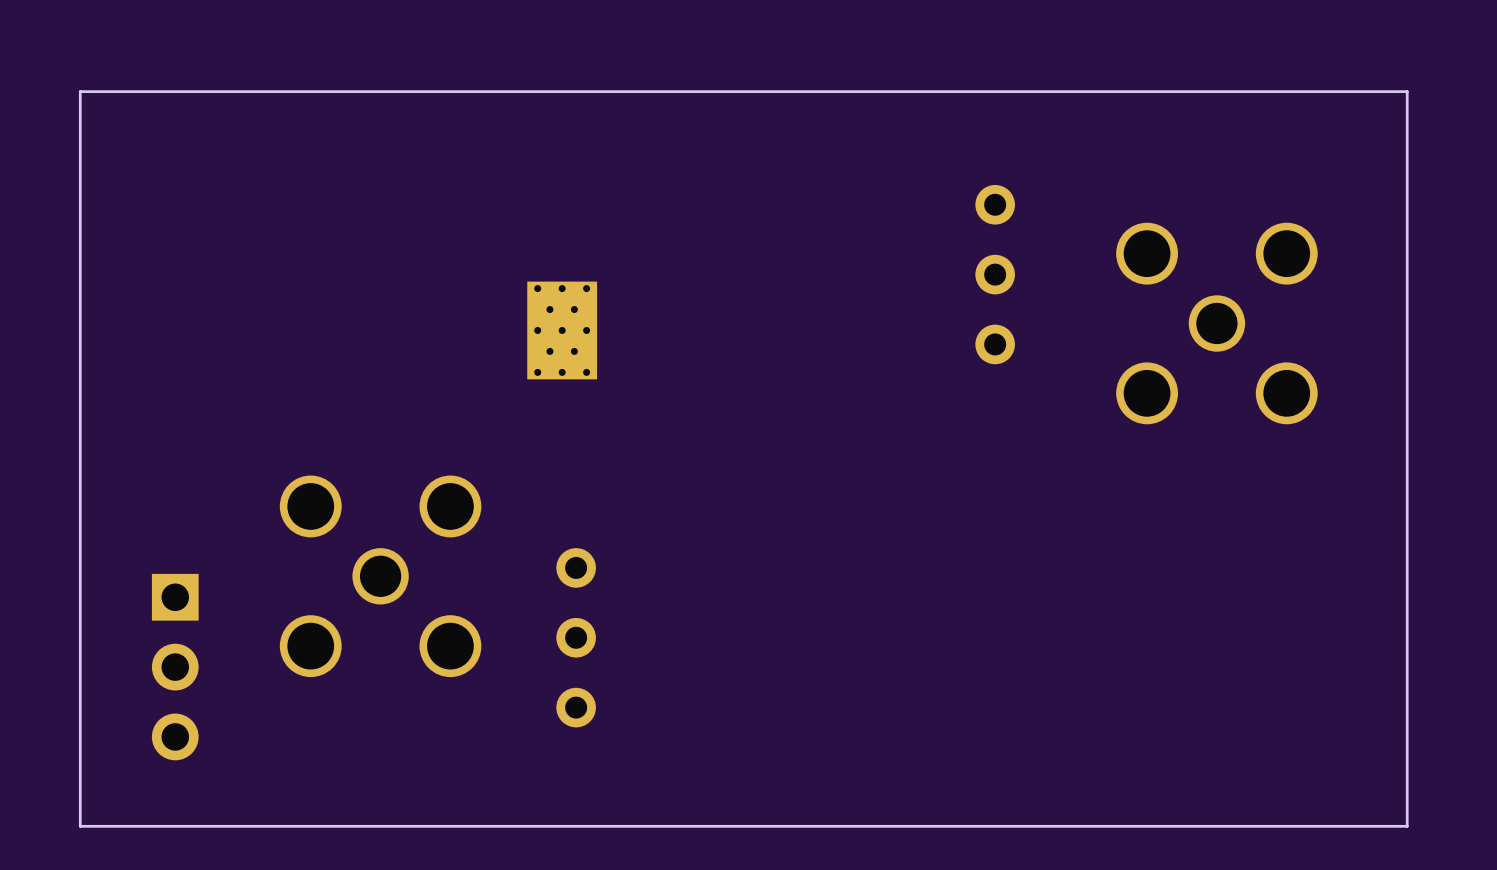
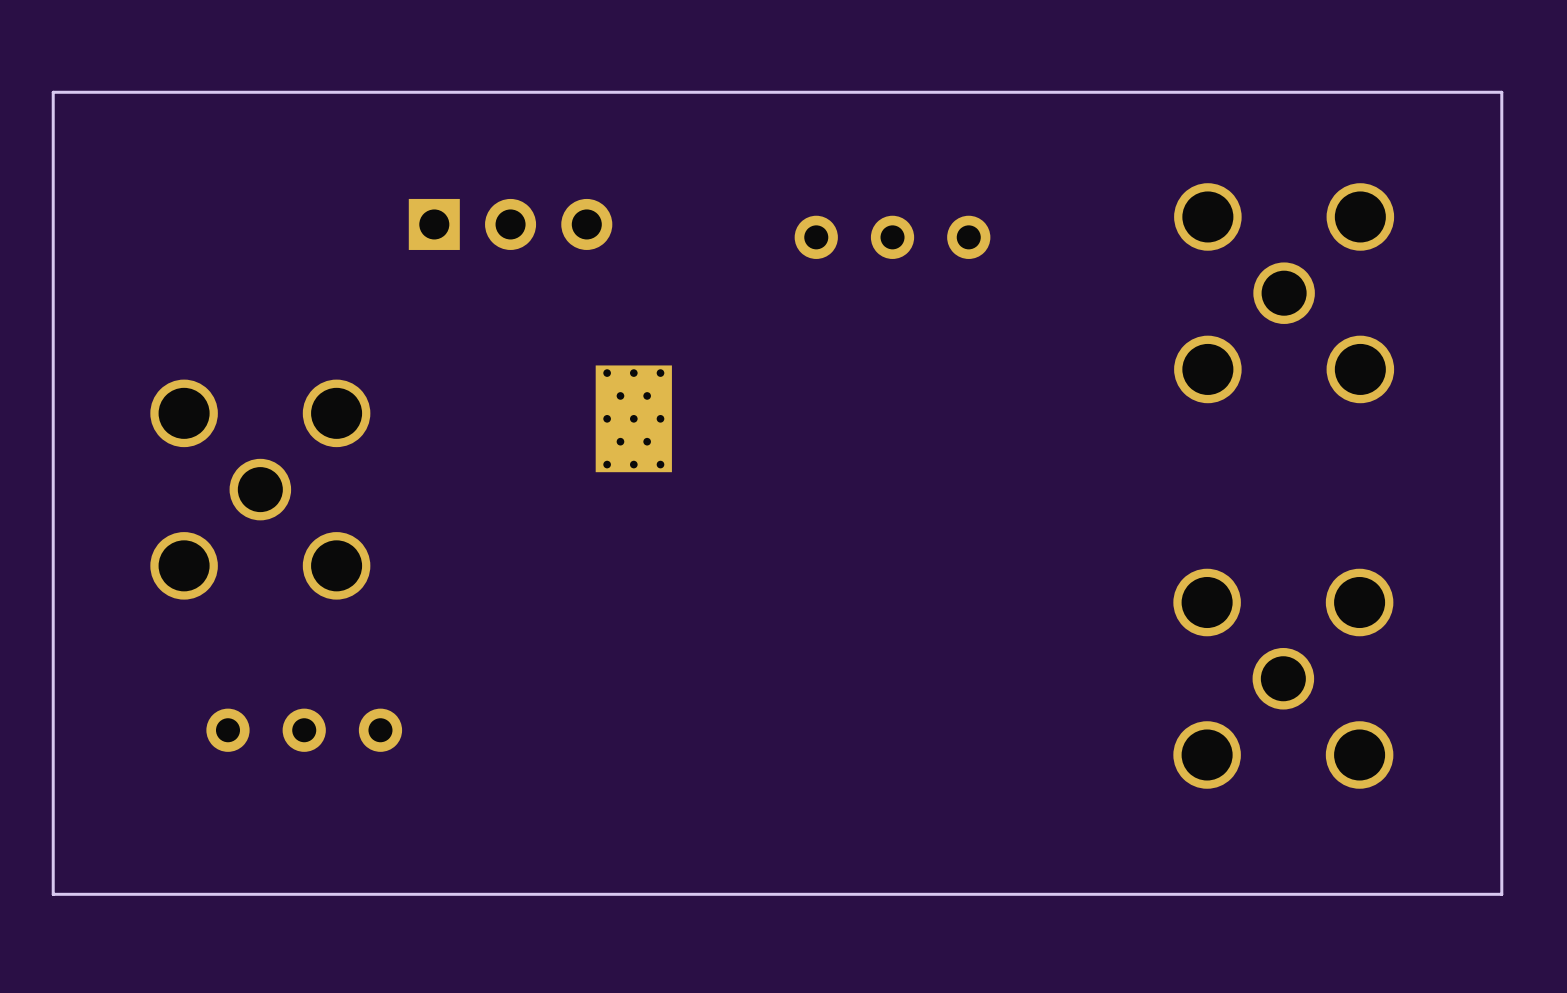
part rotation: 0° (995, 274) -> 90° clockwise (892, 237)
part position: (995, 274) -> (892, 237)
part position: (1216, 323) -> (1284, 293)
part position: (562, 330) -> (633, 418)
part position: (380, 576) -> (260, 489)
part: none -> (1283, 678)
part: (576, 637) -> none
part rotation: 0° (175, 667) -> 90° counterclockwise (510, 224)
part position: (175, 667) -> (510, 224)
part: none -> (304, 730)

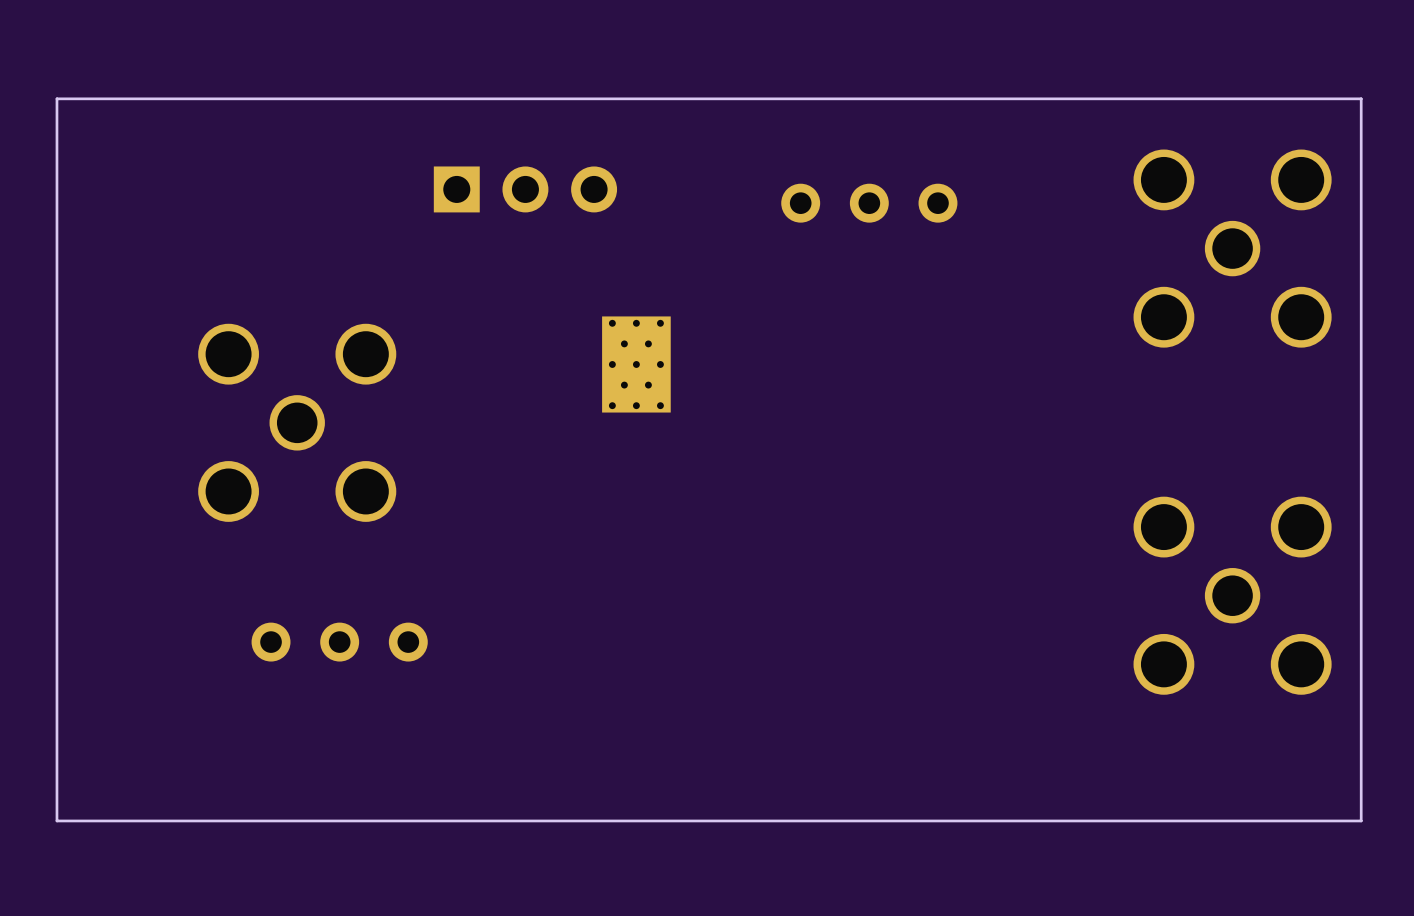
part position: (510, 224) -> (525, 189)
part position: (892, 237) -> (869, 203)
part position: (1284, 293) -> (1232, 248)
part position: (633, 418) -> (636, 364)
part position: (260, 489) -> (297, 422)
part position: (1283, 678) -> (1232, 595)
part position: (304, 730) -> (339, 642)

